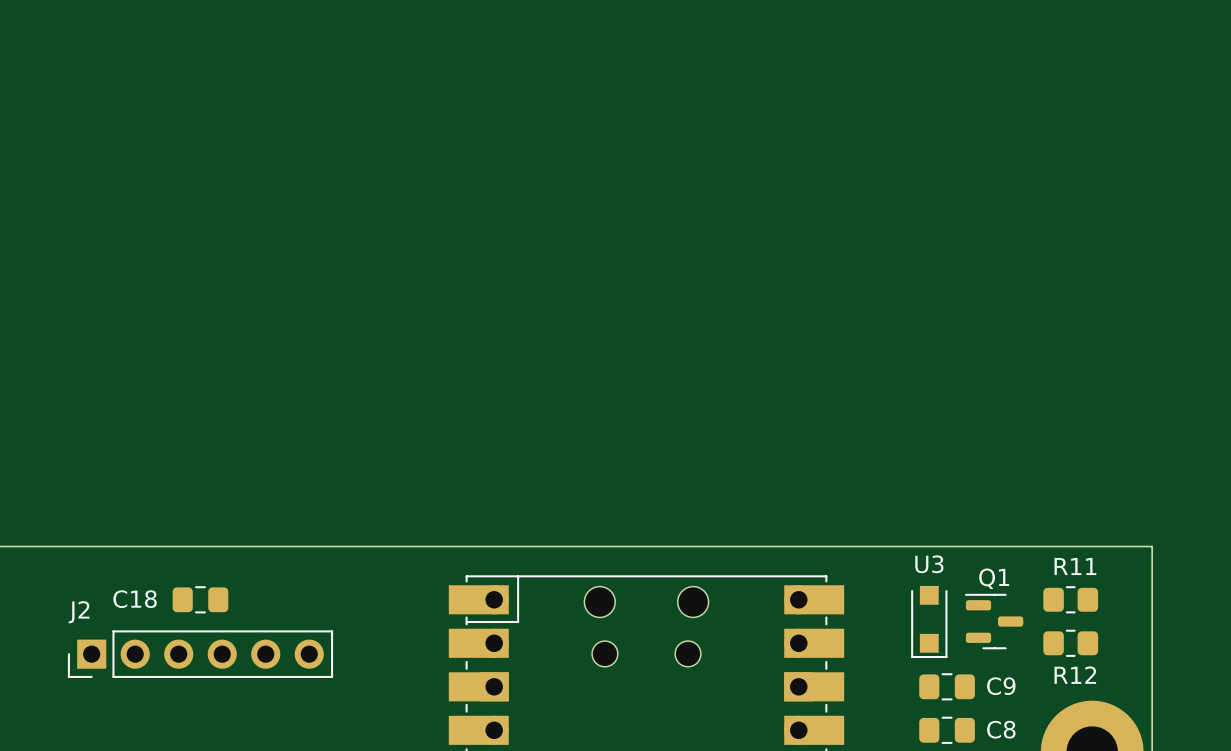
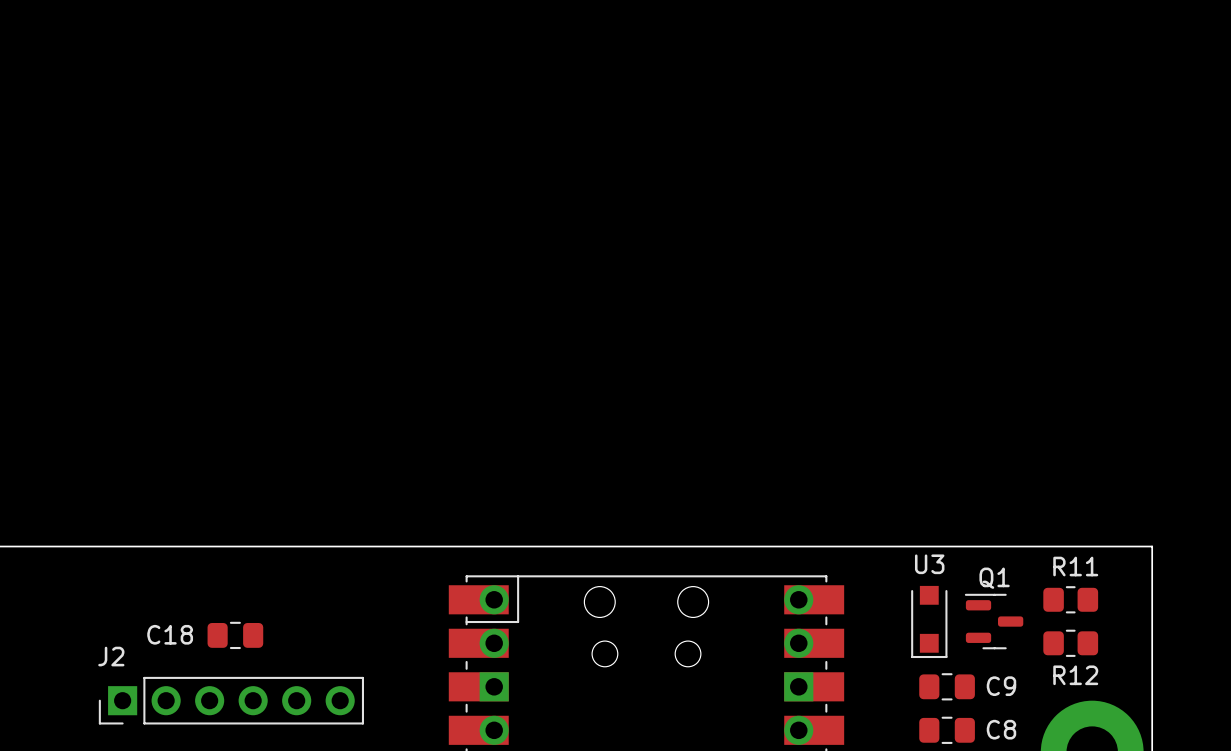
C18 position: (200, 599) -> (235, 635)
J2 position: (200, 654) -> (231, 700)

